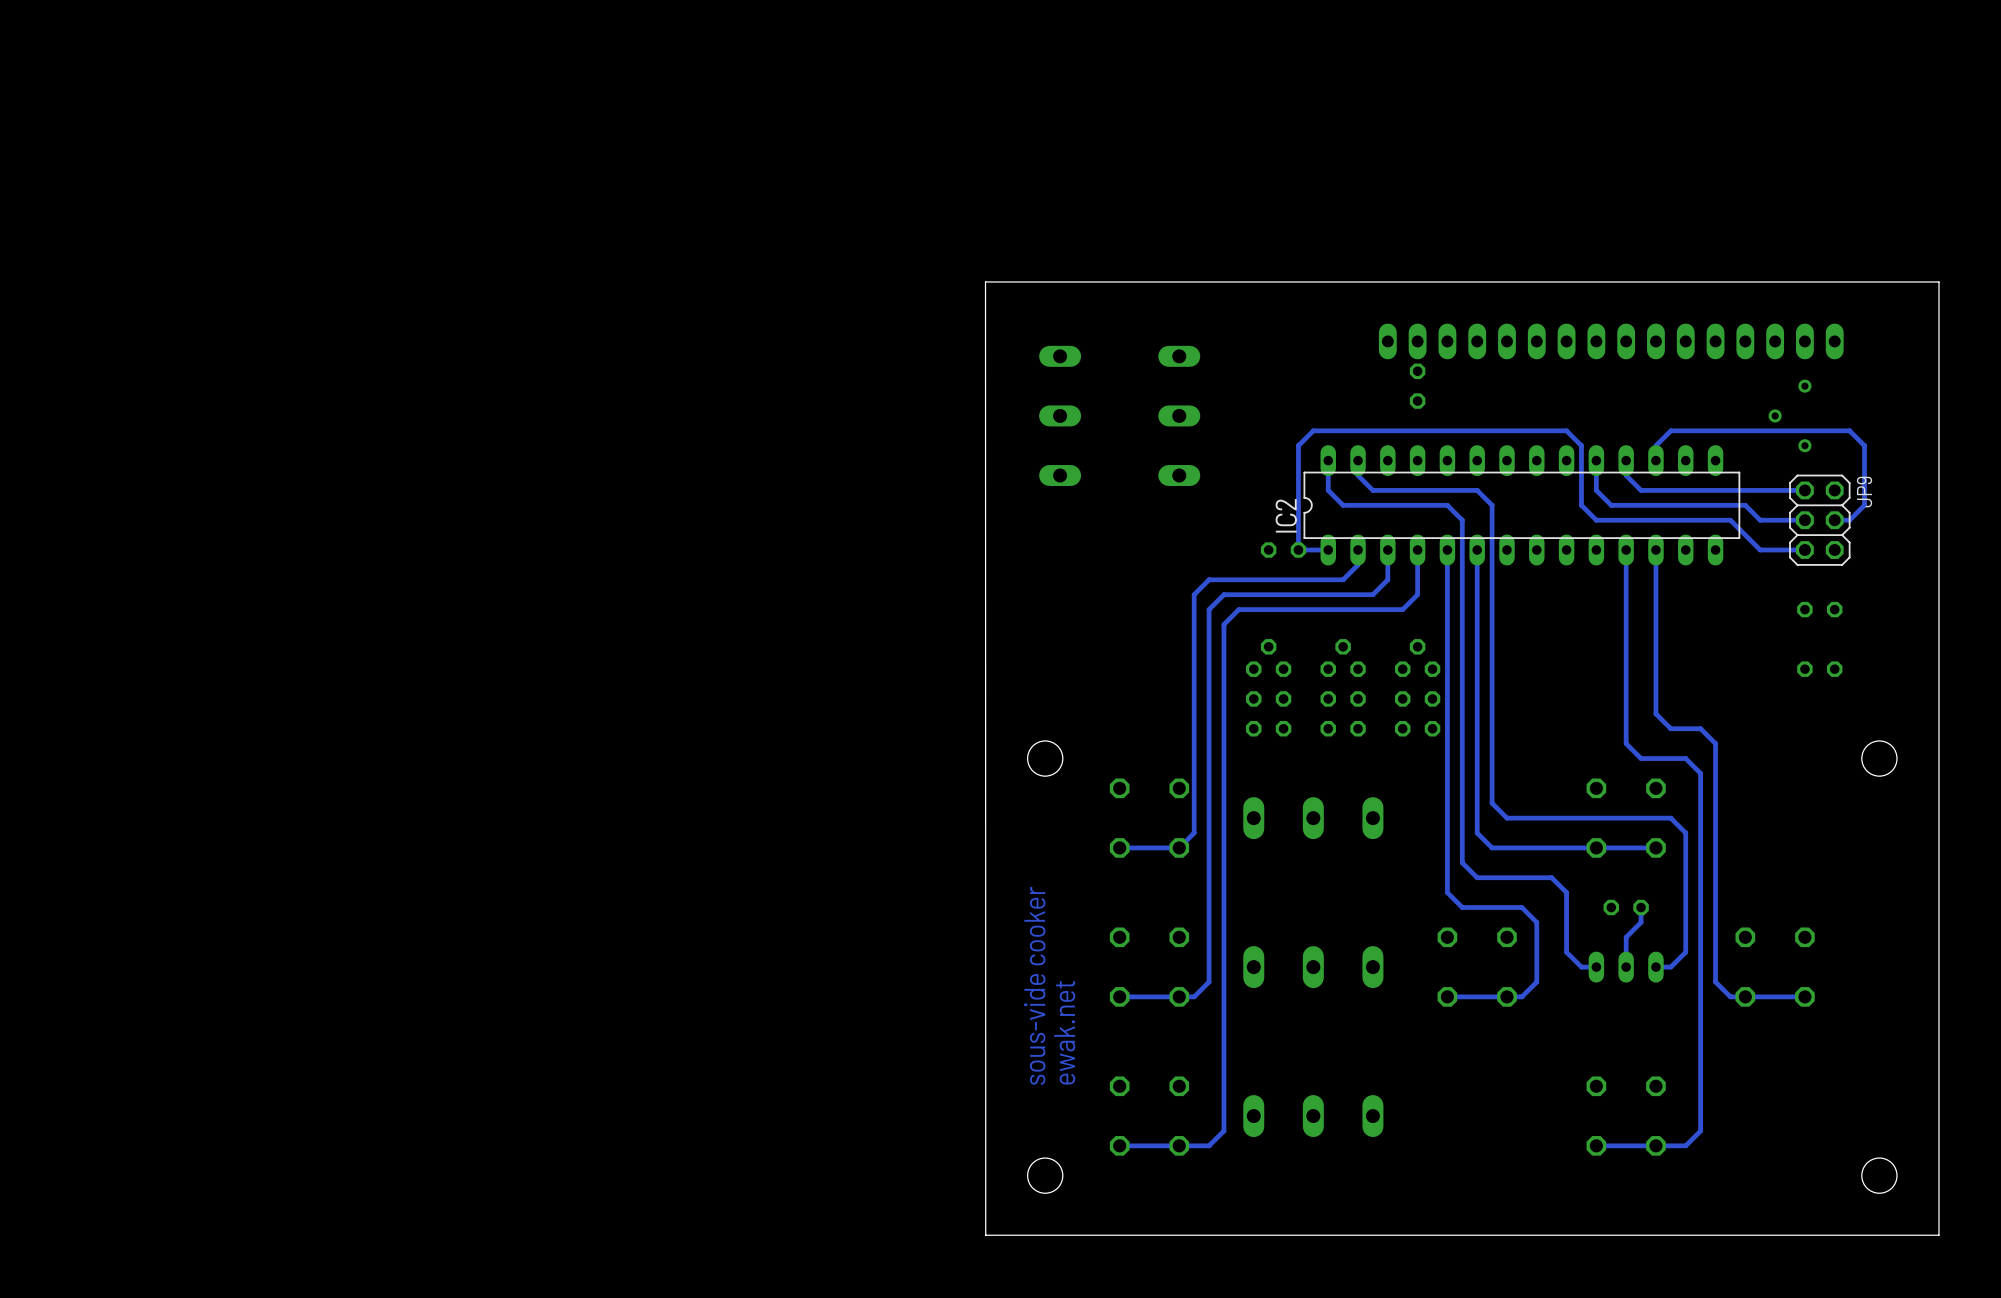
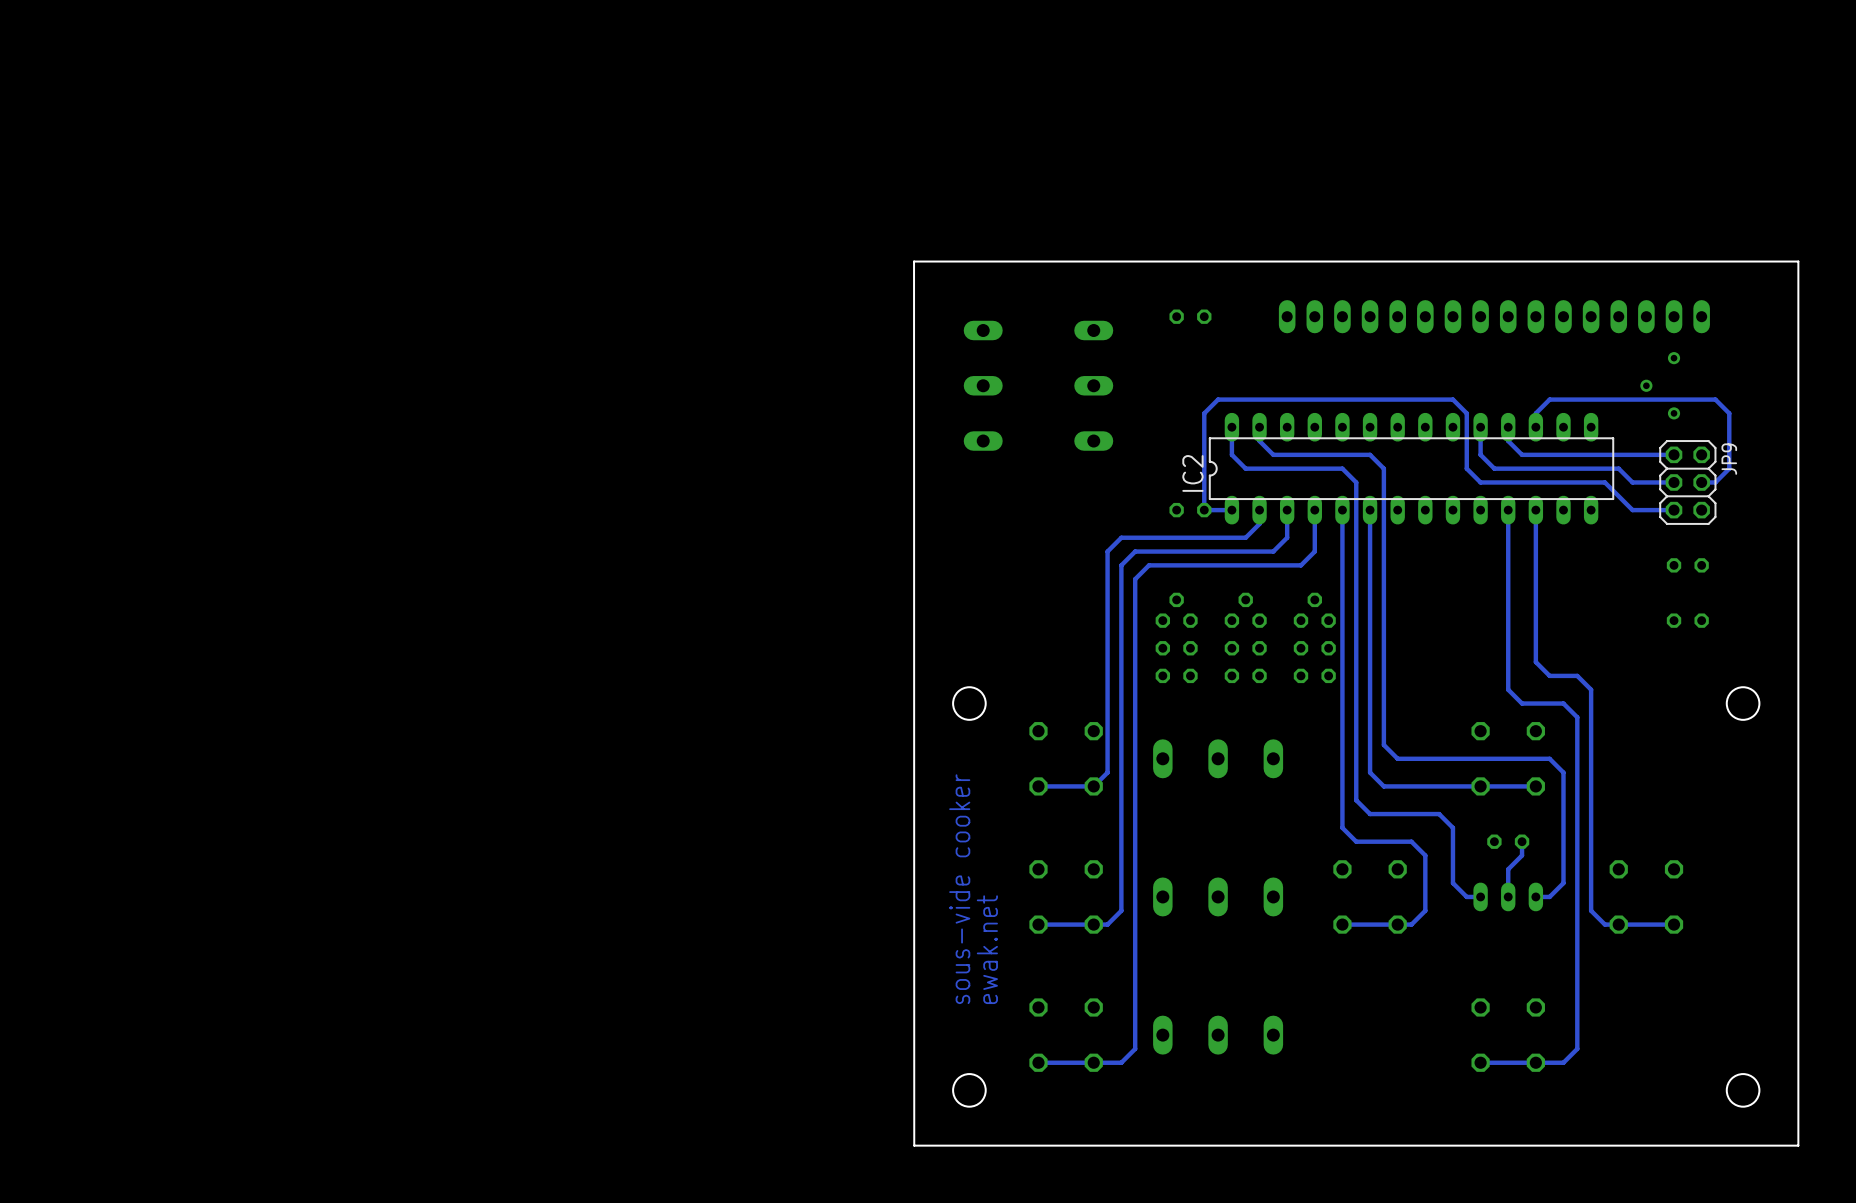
part rotation: 0° (1417, 386) -> 90° clockwise (1190, 316)
part position: (1417, 386) -> (1190, 316)

